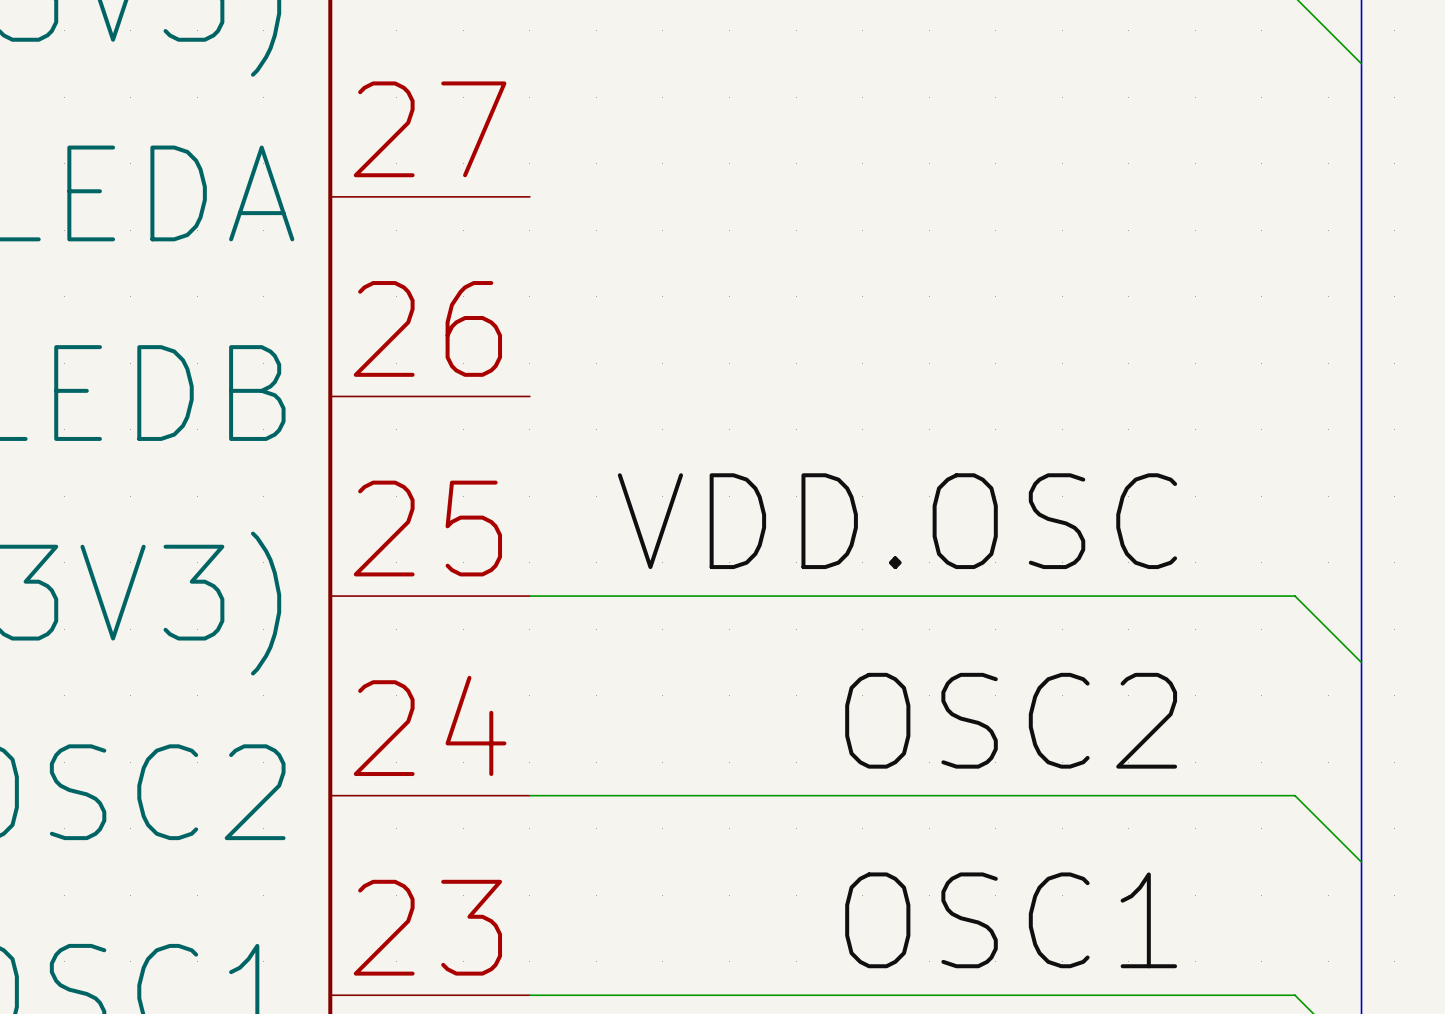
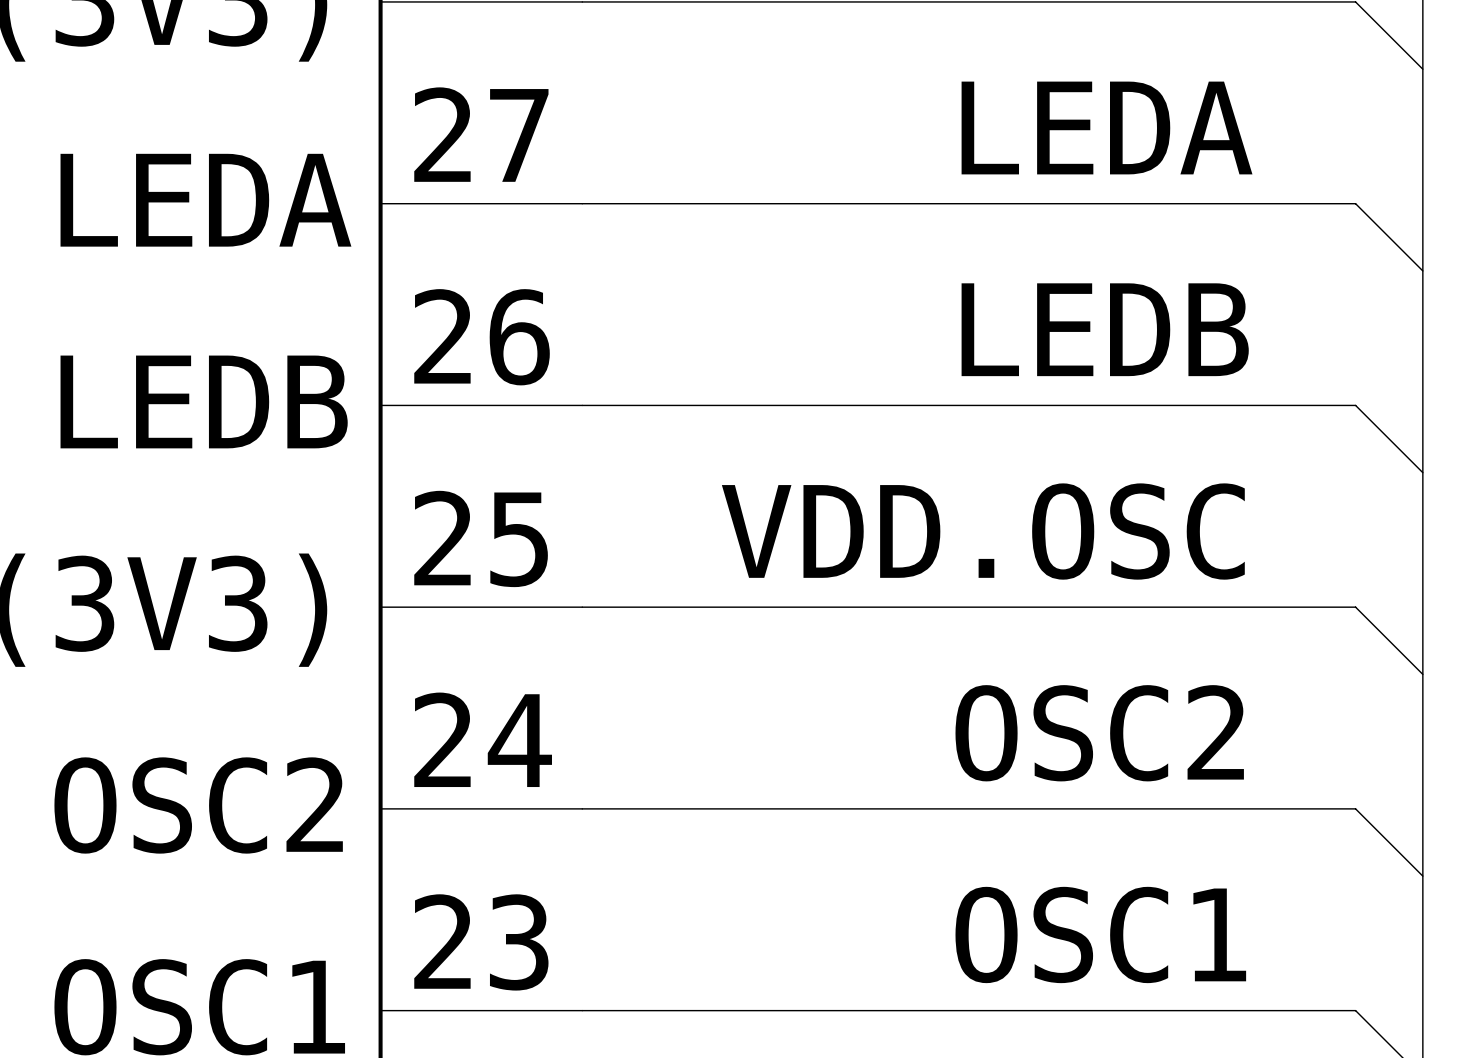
label: none -> LEDA (1107, 127)
wire: none -> (582, 203) (1355, 203) (1422, 270)
label: none -> LEDB (1105, 329)
wire: none -> (582, 405) (1355, 405) (1422, 472)

